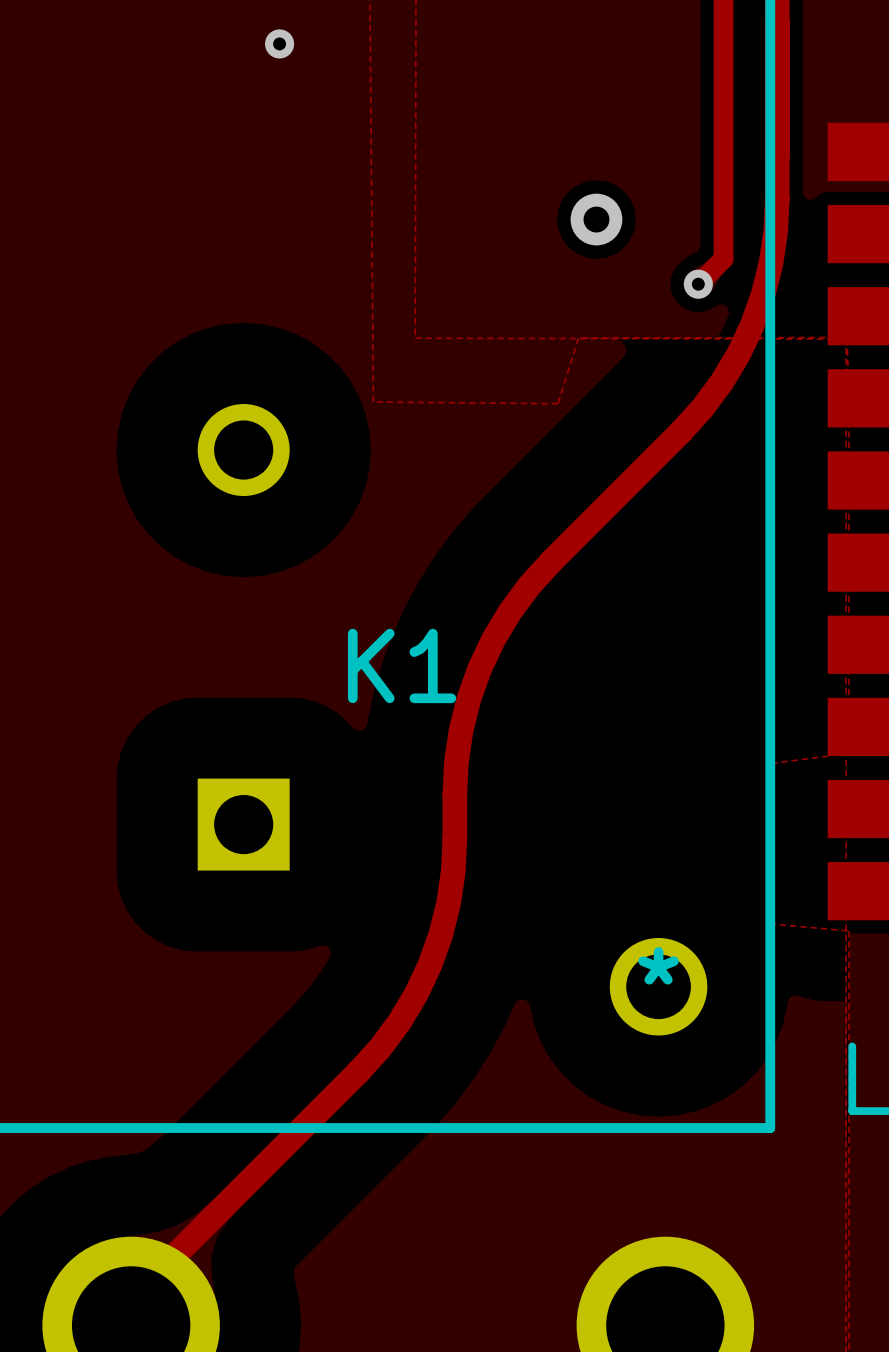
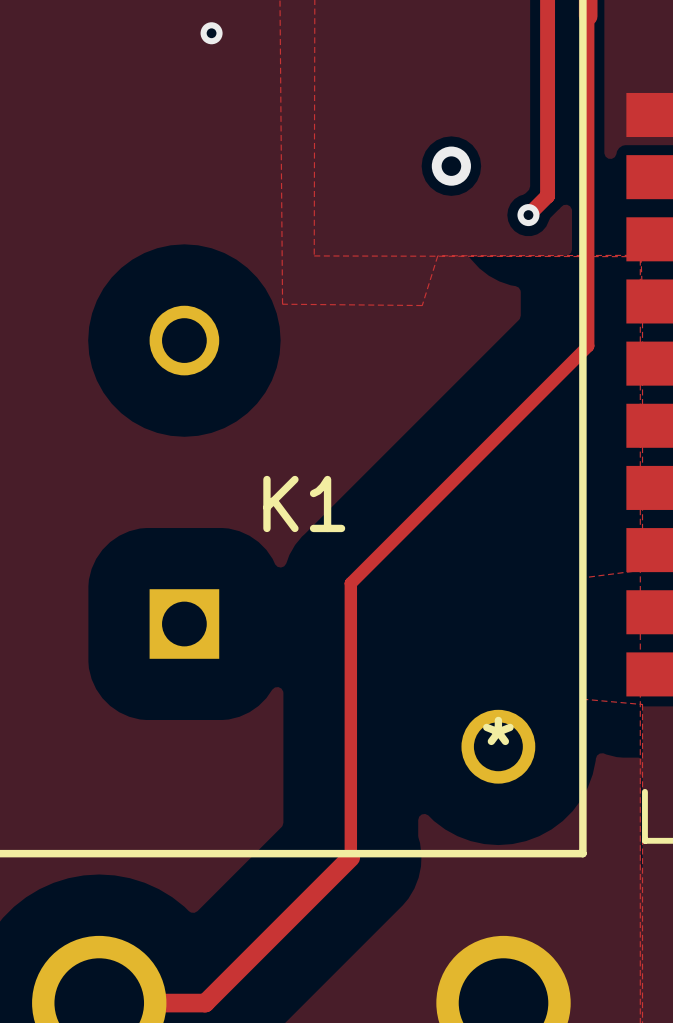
track width: thick (777, 21) (777, 199) -> thin (588, 16) (588, 151)
track: (777, 199) (775, 231) (770, 263) (763, 294) (752, 325) (738, 354) (721, 382) (702, 407) (681, 431) (529, 585) (510, 611) (493, 639) (479, 668) (468, 698) (461, 730) (456, 761) (453, 871) (448, 903) (440, 934) (429, 965) (416, 994) (399, 1022) (380, 1047) (358, 1071) (131, 1299) (131, 1325) -> (588, 151) (588, 346) (350, 583) (350, 857) (205, 1003) (99, 1003)

